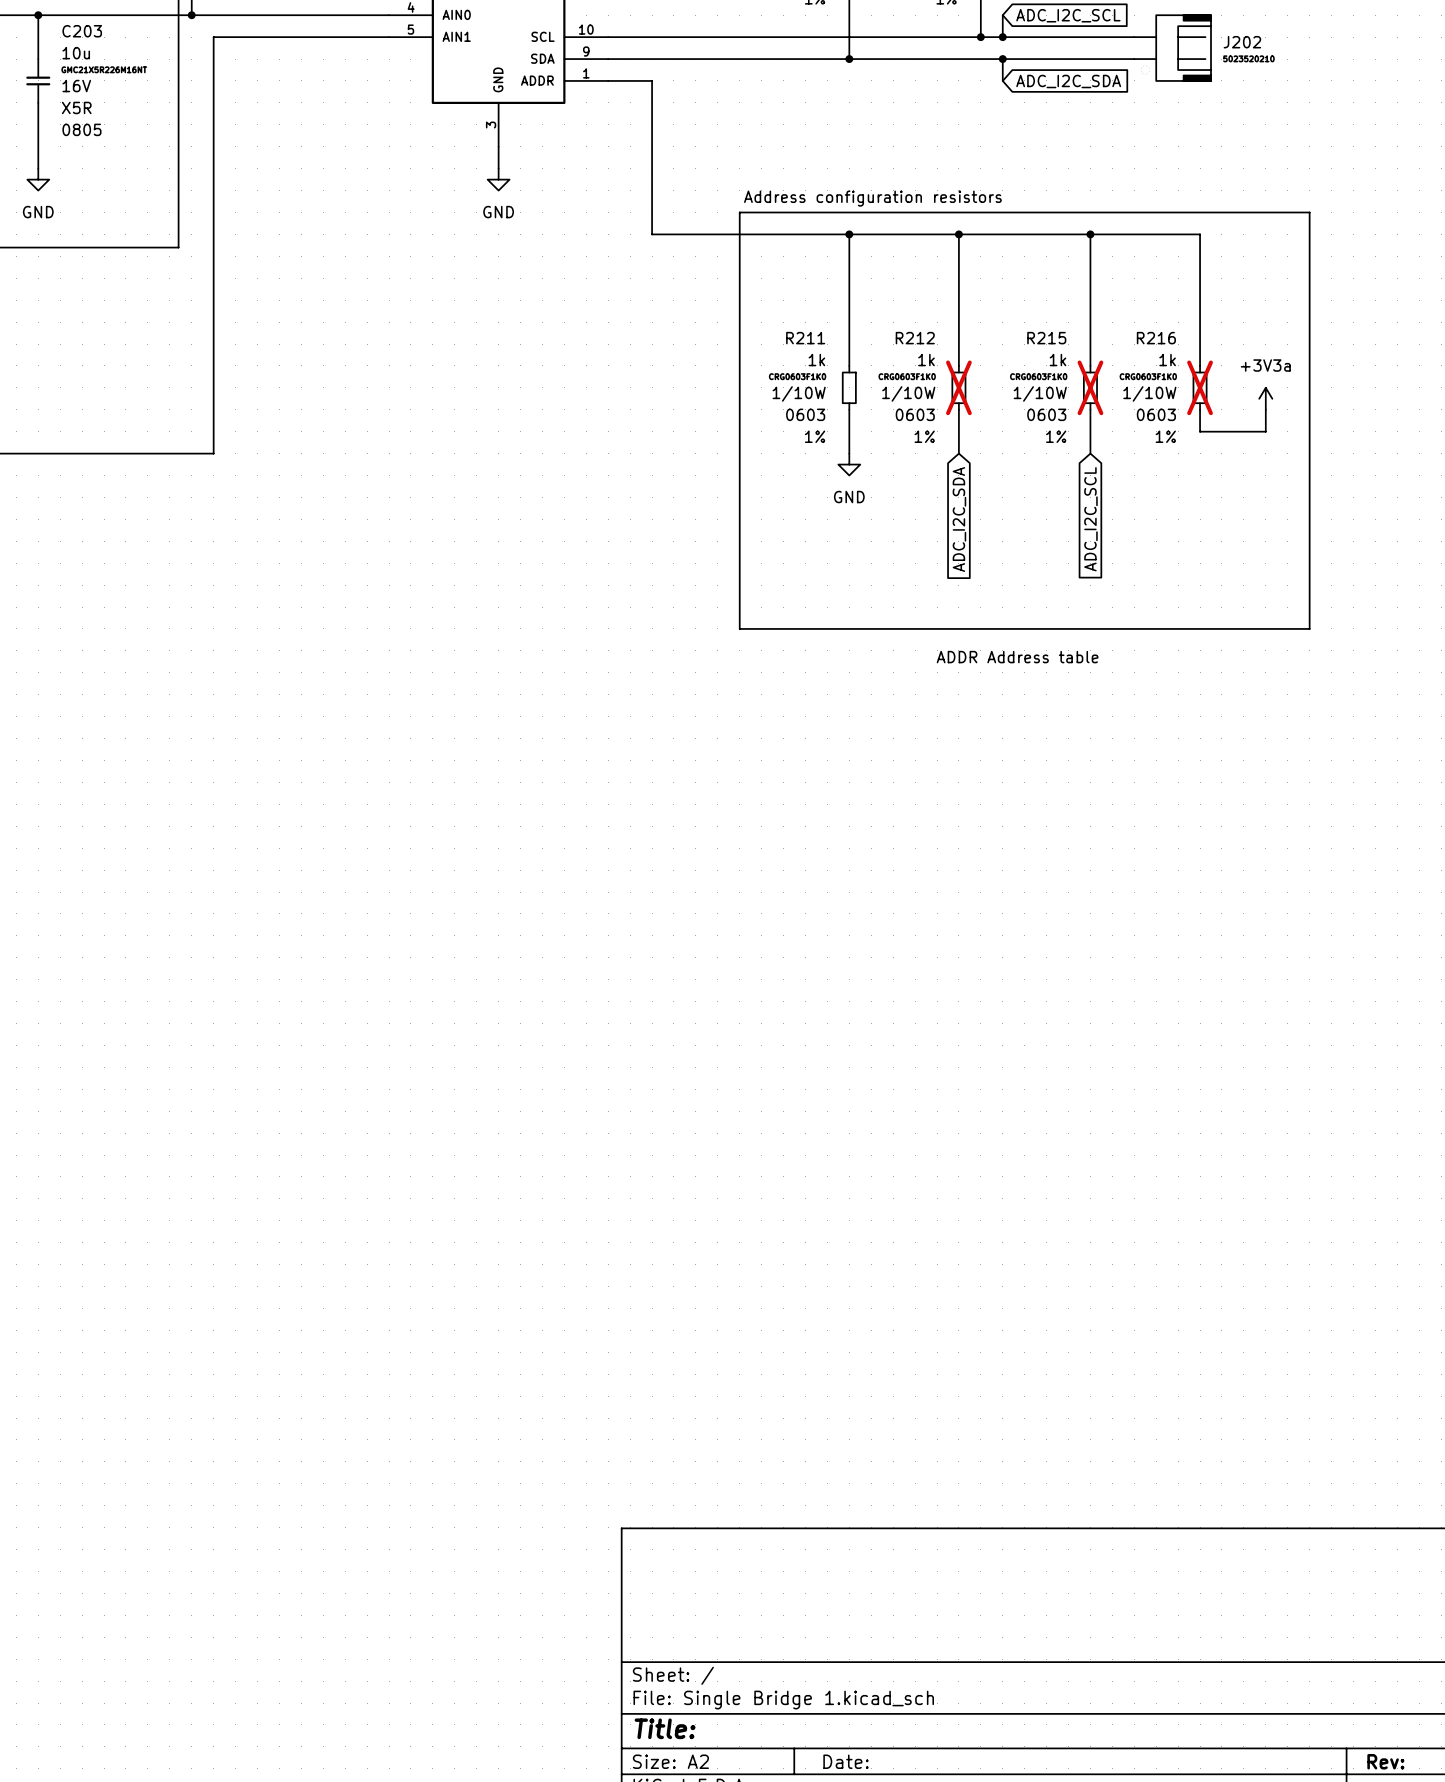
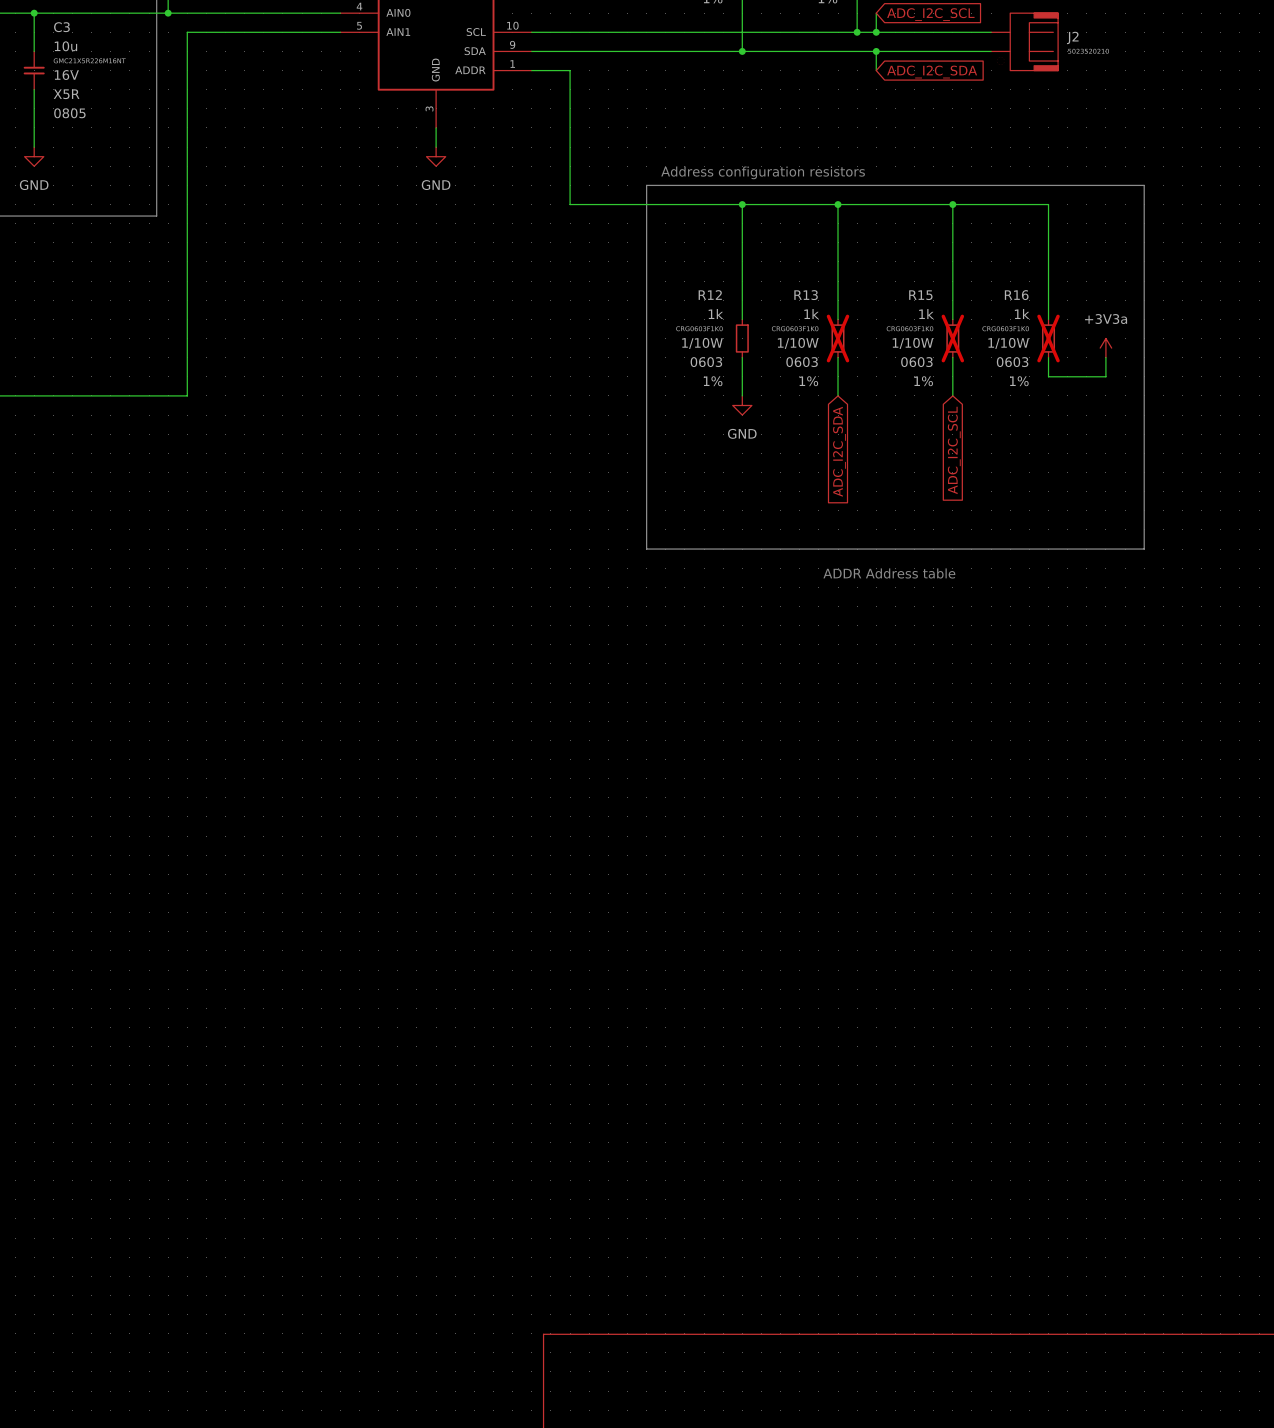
C203 name: C203 (82, 31) -> C3 (61, 27)
J202 name: J202 (1242, 42) -> J2 (1072, 37)
R211 name: R211 (805, 338) -> R12 (710, 295)
R212 name: R212 (915, 338) -> R13 (806, 295)
R215 name: R215 (1046, 338) -> R15 (920, 295)
R216 name: R216 (1156, 338) -> R16 (1016, 295)

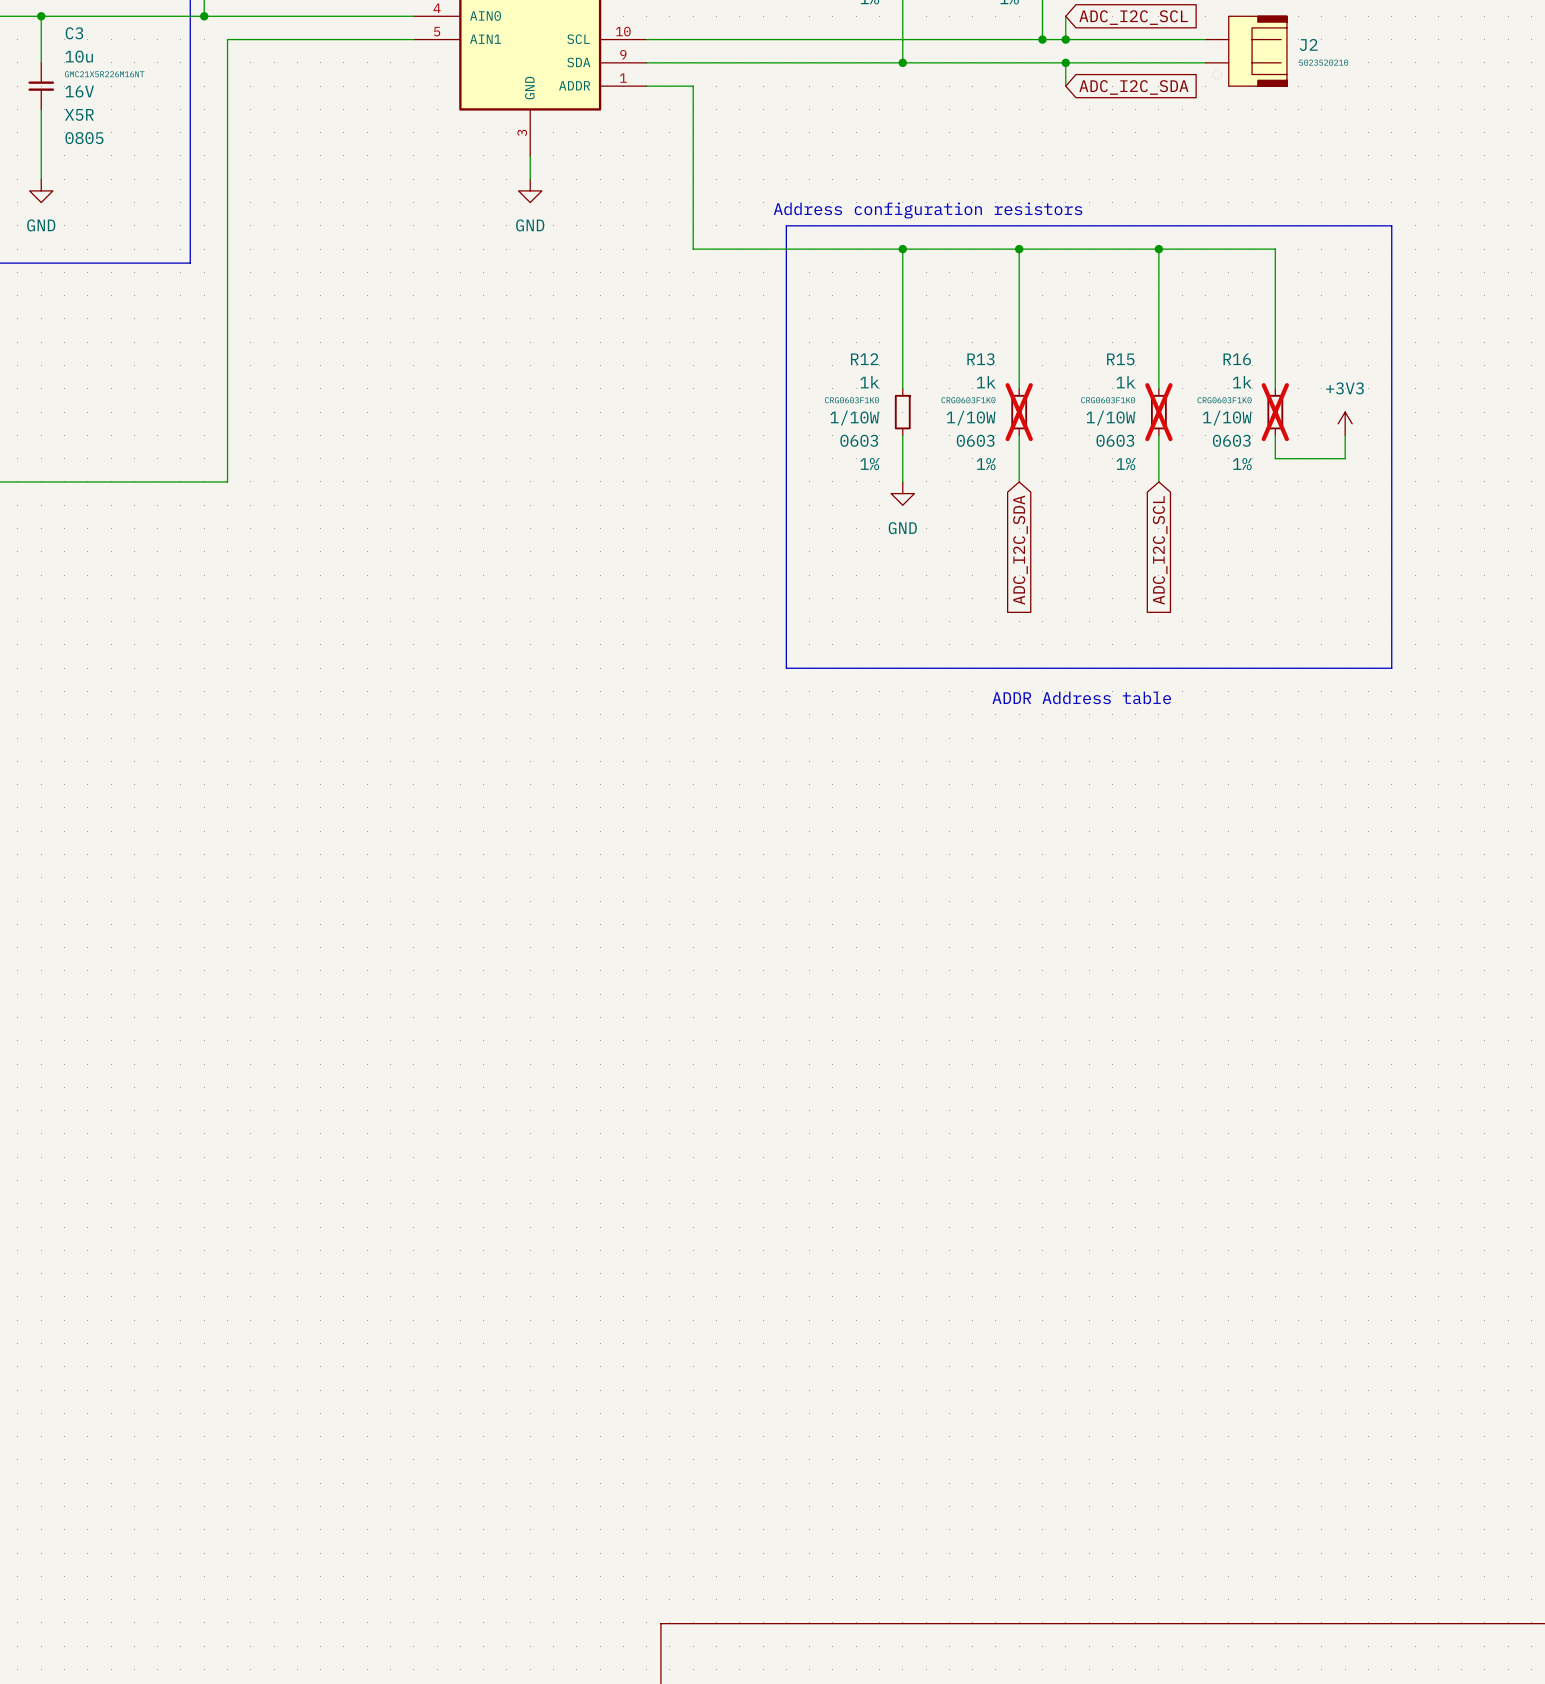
power symbol: +3V3a (1105, 348) -> +3V3 (1345, 423)

